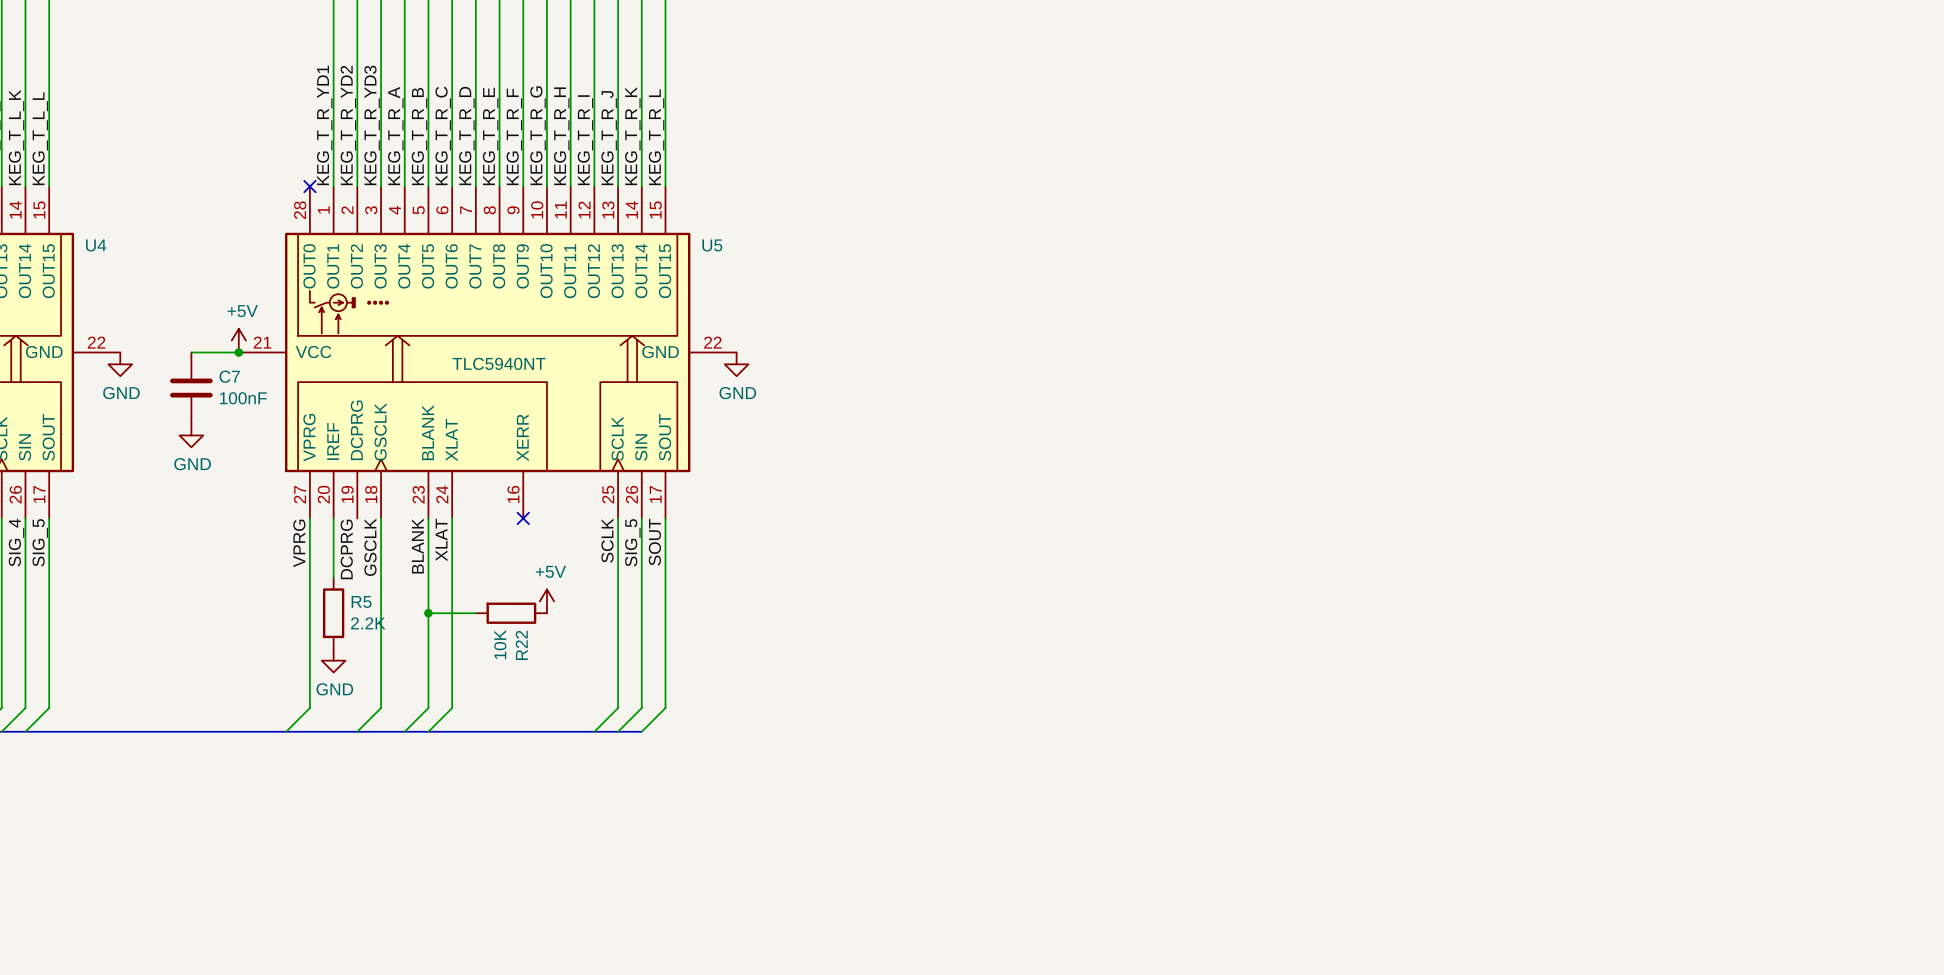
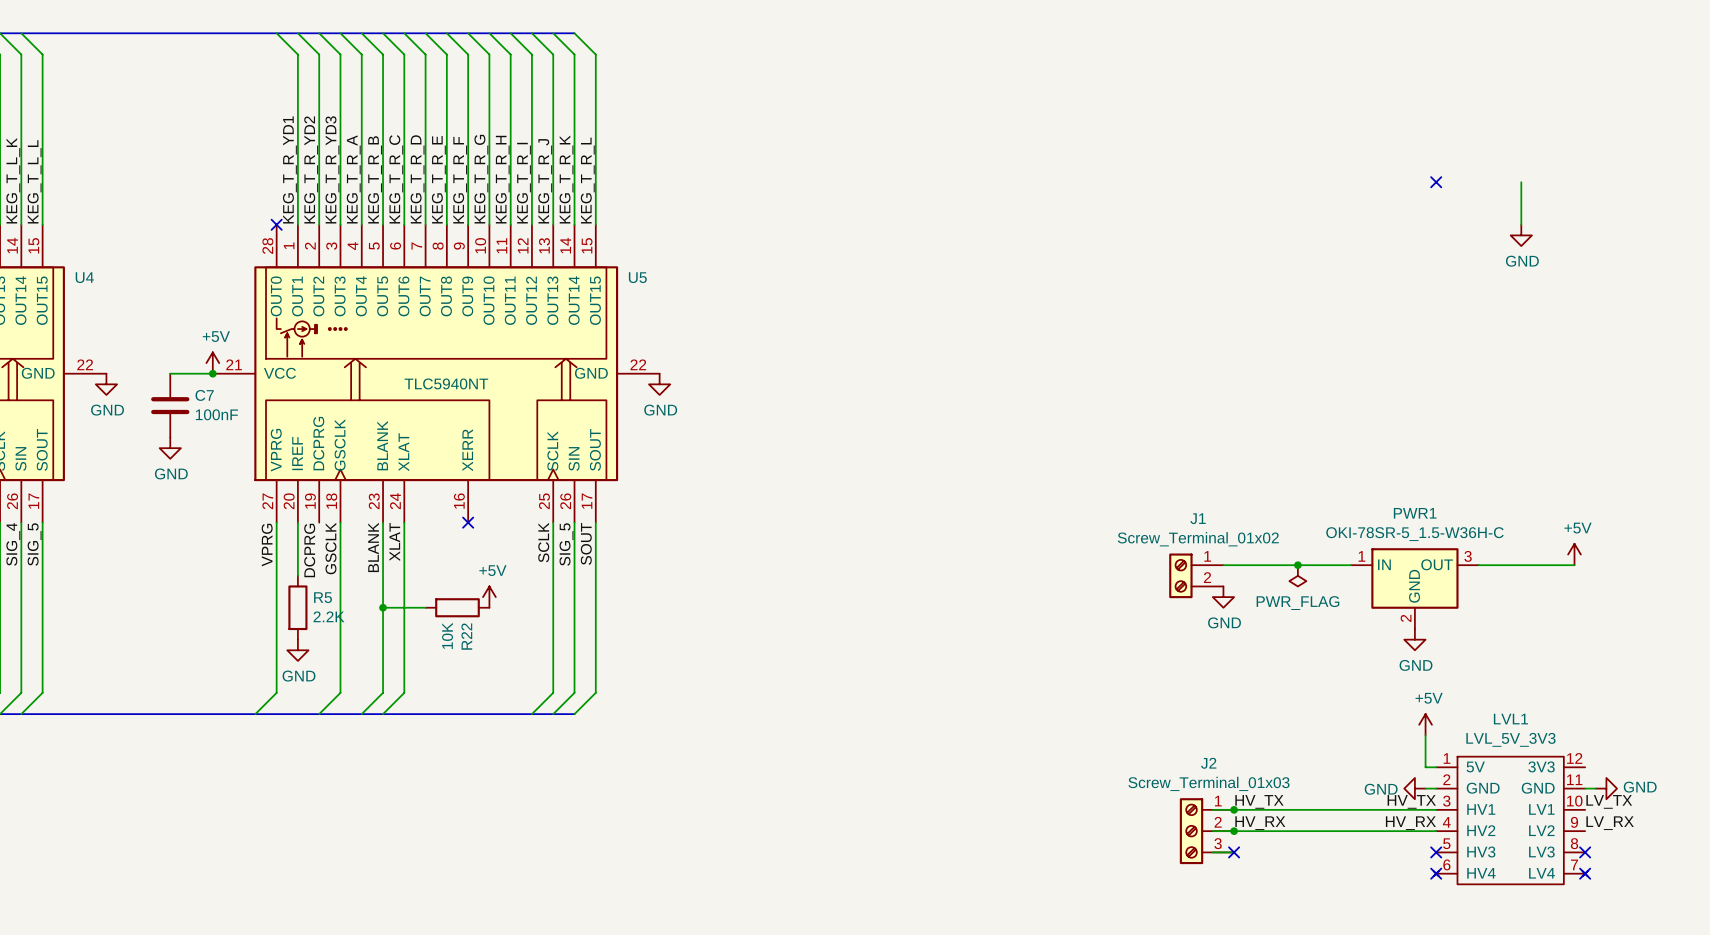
no-connect mark: none -> (1436, 182)
wire: none -> (1521, 182) (1521, 224)
power symbol: none -> GND (1521, 235)
power symbol: none -> +5V (1574, 554)
wire: none -> (1223, 565) (1351, 565)
junction: none -> (1297, 565)
wire: none -> (1478, 565) (1574, 565)
J1: none -> Screw_Terminal_01x02 (1196, 575)
power symbol: none -> PWR_FLAG (1297, 575)
PWR1: none -> OKI-78SR-5_1.5-W36H-C (1414, 588)
power symbol: none -> GND (1223, 597)
power symbol: none -> GND (1414, 639)
power symbol: none -> +5V (1425, 724)
wire: none -> (1425, 735) (1425, 767) (1436, 767)
power symbol: none -> GND (1414, 788)
wire: none -> (1425, 788) (1436, 788)
wire: none -> (1585, 788) (1595, 788)
power symbol: none -> GND (1606, 788)
label: none -> HV_TX (1259, 801)
label: none -> HV_TX (1411, 801)
label: none -> LV_TX (1609, 801)
wire: none -> (1212, 809) (1436, 809)
junction: none -> (1234, 809)
LVL1: none -> LVL_5V_3V3 (1510, 820)
label: none -> HV_RX (1260, 823)
label: none -> HV_RX (1410, 823)
label: none -> LV_RX (1610, 823)
J2: none -> Screw_Terminal_01x03 (1206, 831)
wire: none -> (1212, 831) (1436, 831)
junction: none -> (1234, 831)
wire: none -> (1212, 852) (1234, 852)
no-connect mark: none -> (1234, 852)
no-connect mark: none -> (1436, 852)
no-connect mark: none -> (1585, 852)
no-connect mark: none -> (1436, 873)
no-connect mark: none -> (1585, 873)

